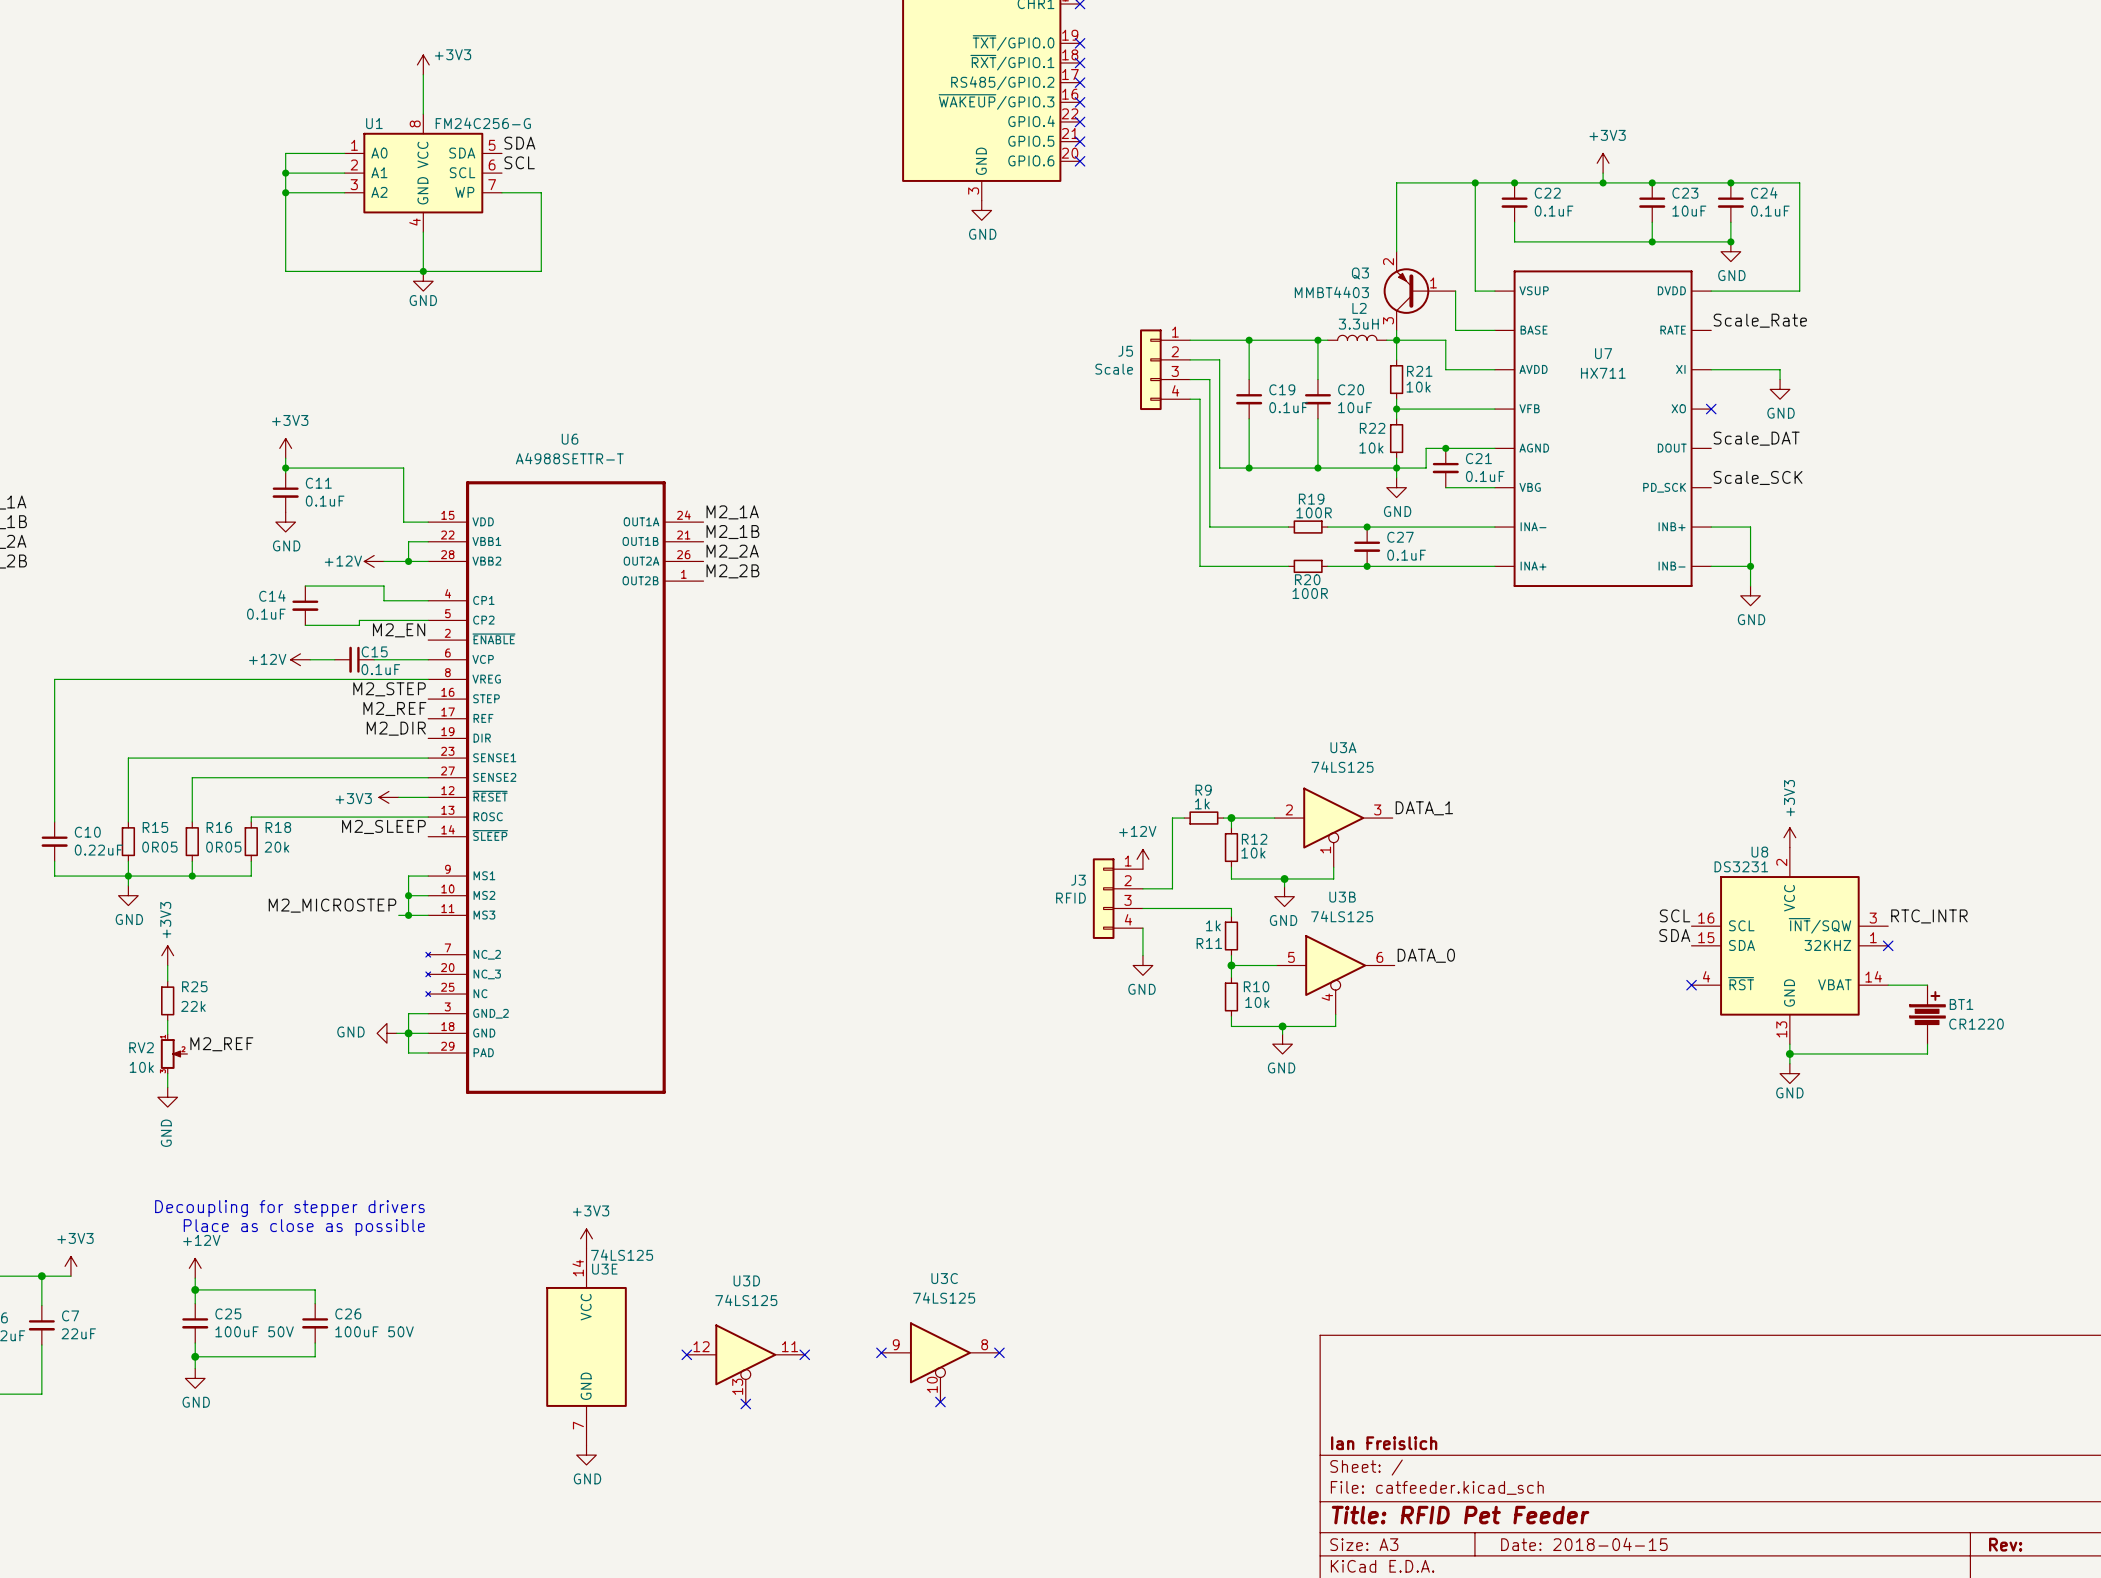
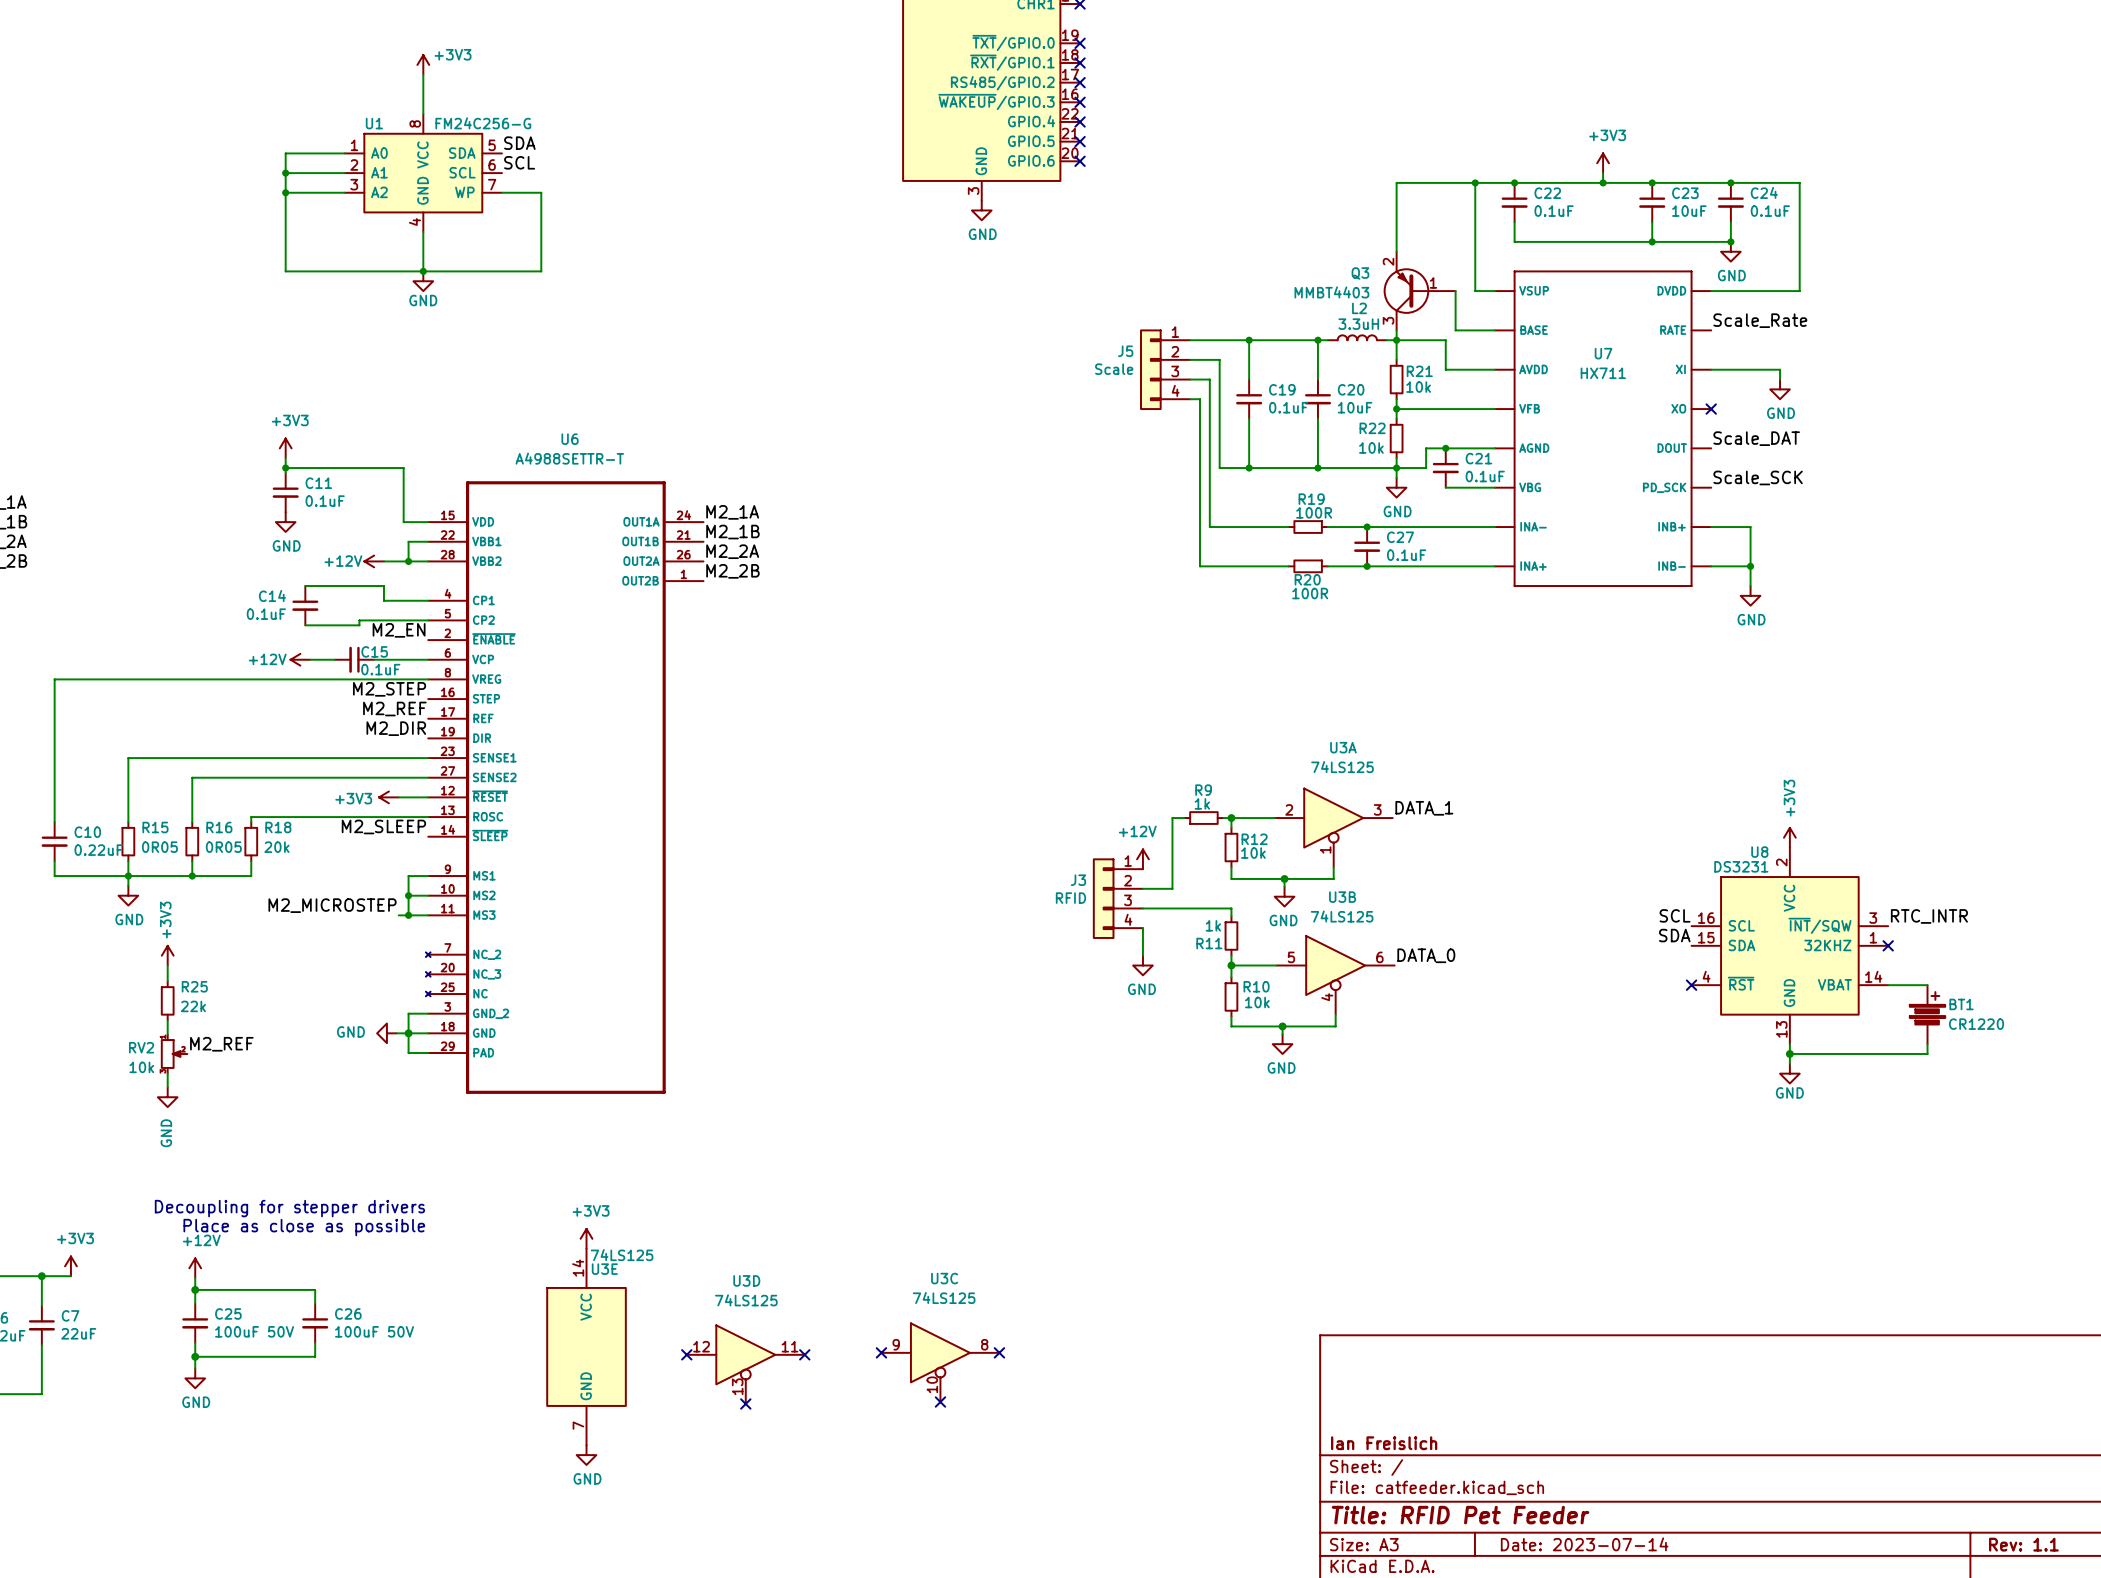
title block: Date: 2018-04-15 (1584, 1544) -> Date: 2023-07-14 (1584, 1544)
title block: Rev: (2005, 1544) -> Rev: 1.1 (2023, 1544)

